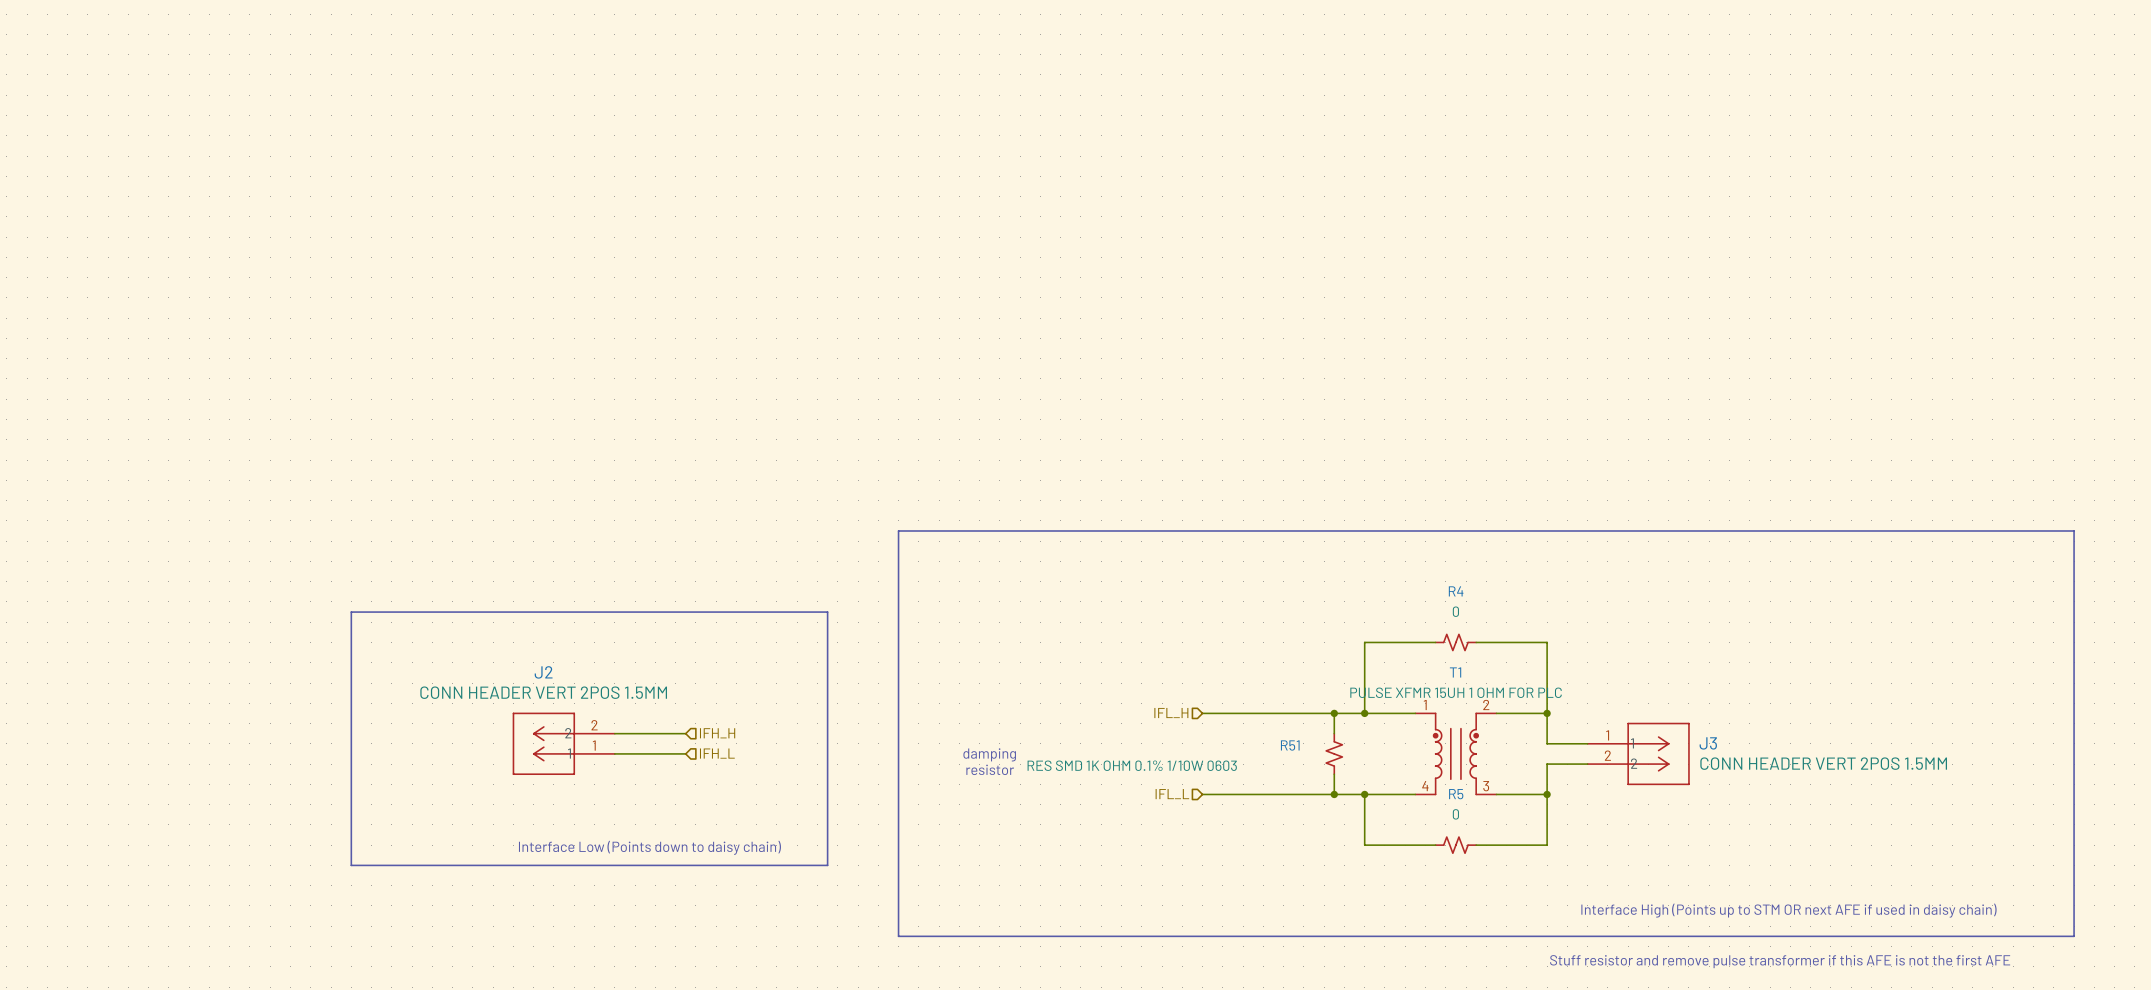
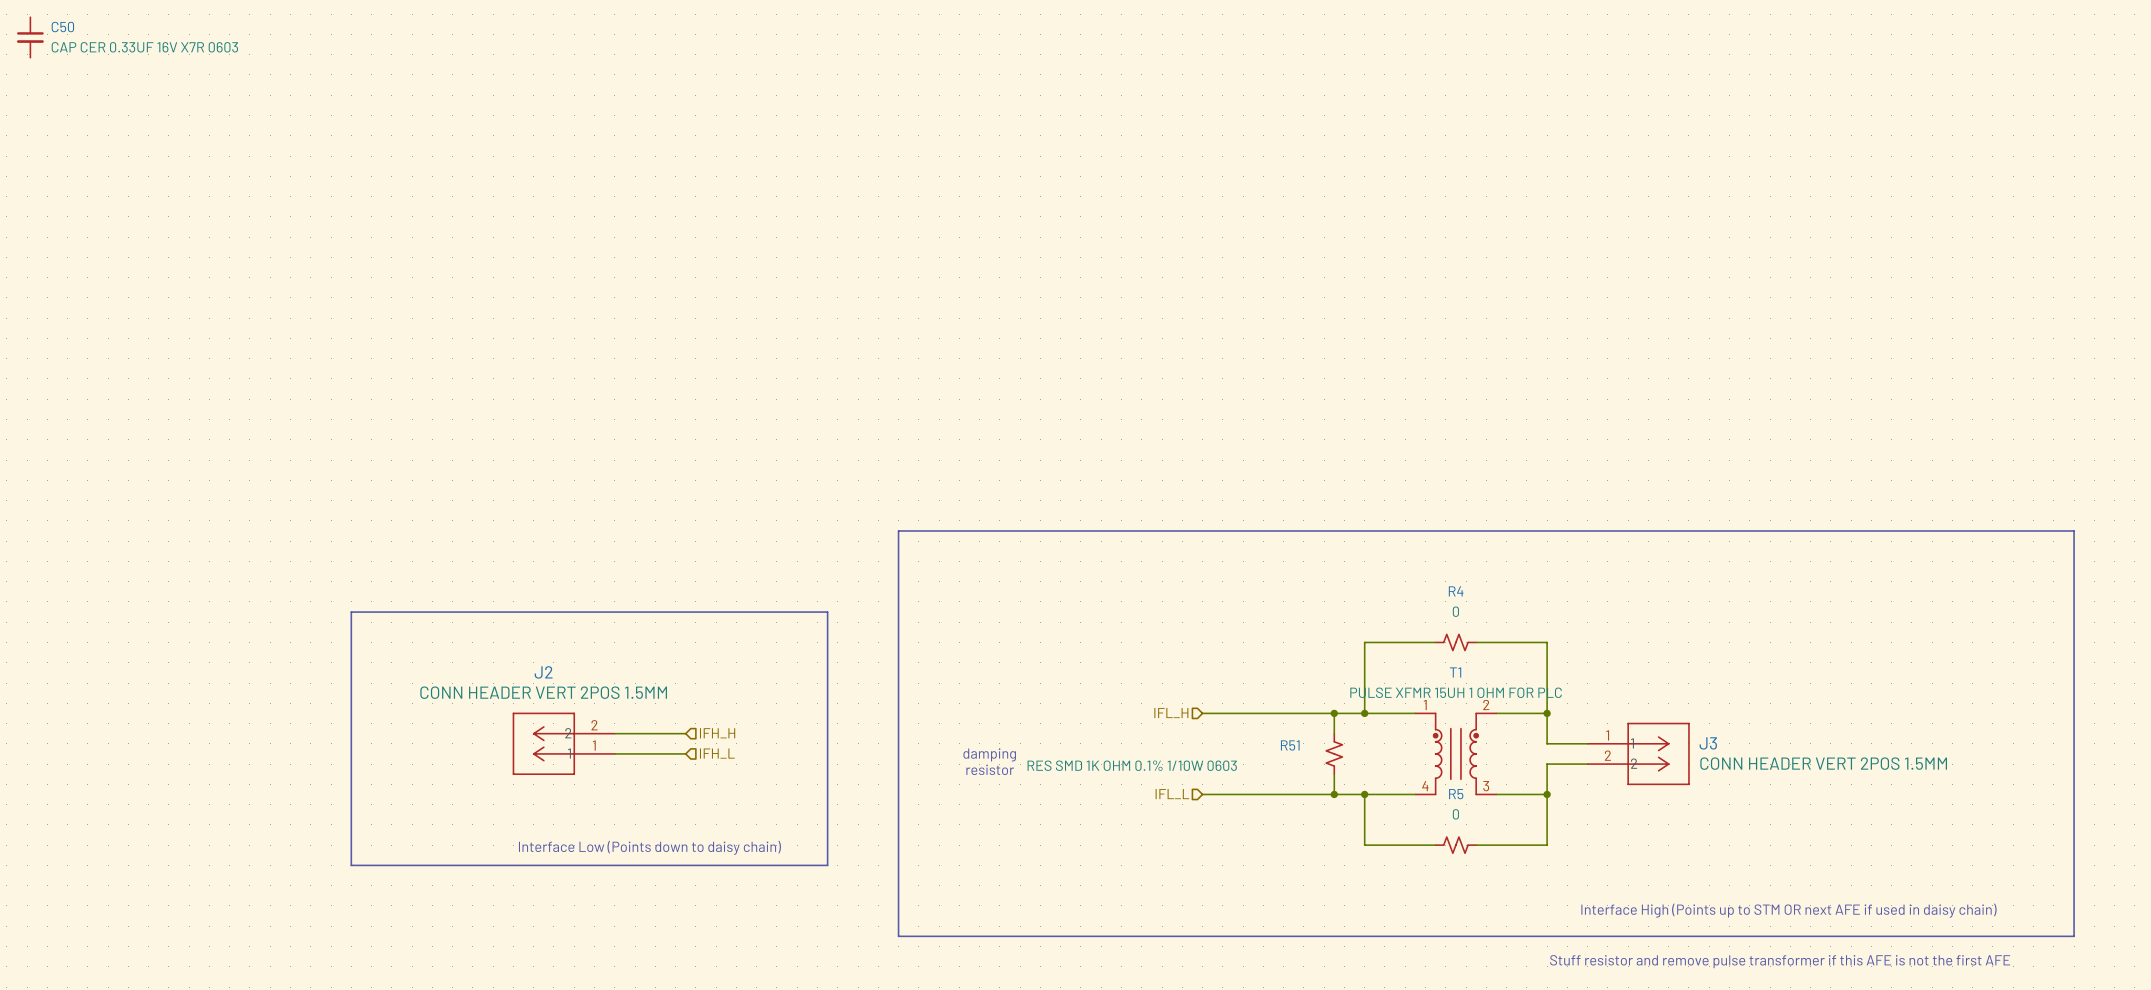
C50: none -> CAP CER 0.33UF 16V X7R 0603 (30, 37)

